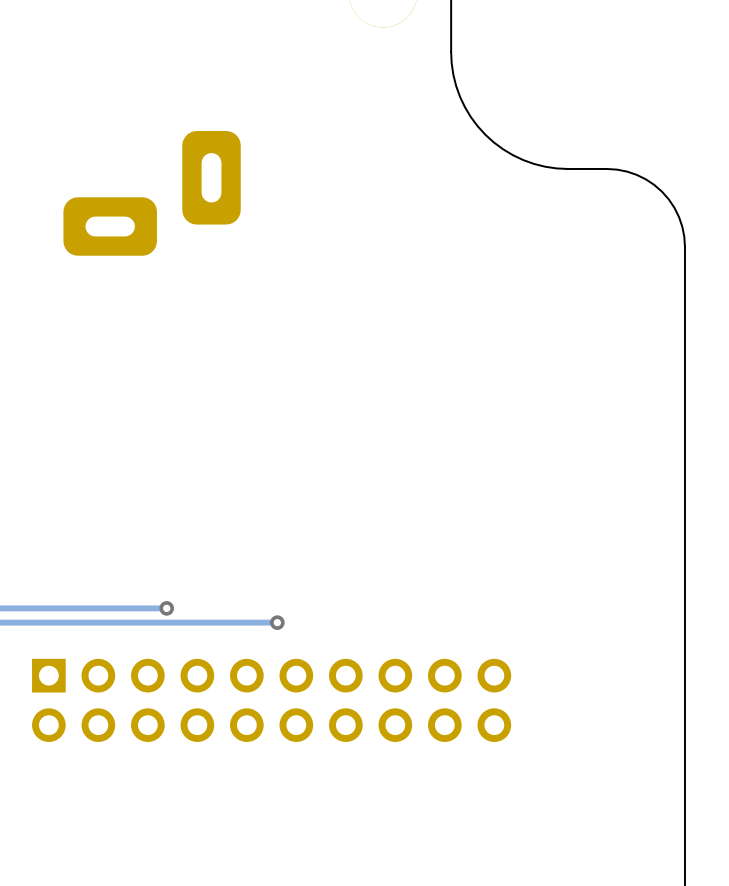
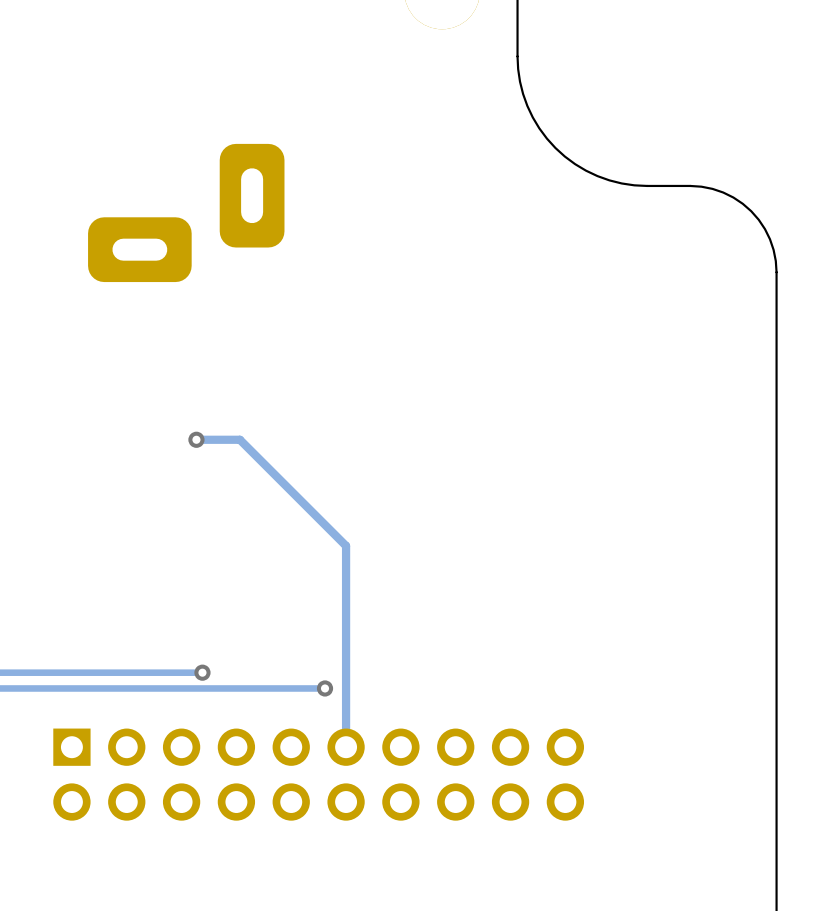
track: none -> (196, 439) (239, 439) (346, 545) (346, 747)
via: none -> (196, 439)

